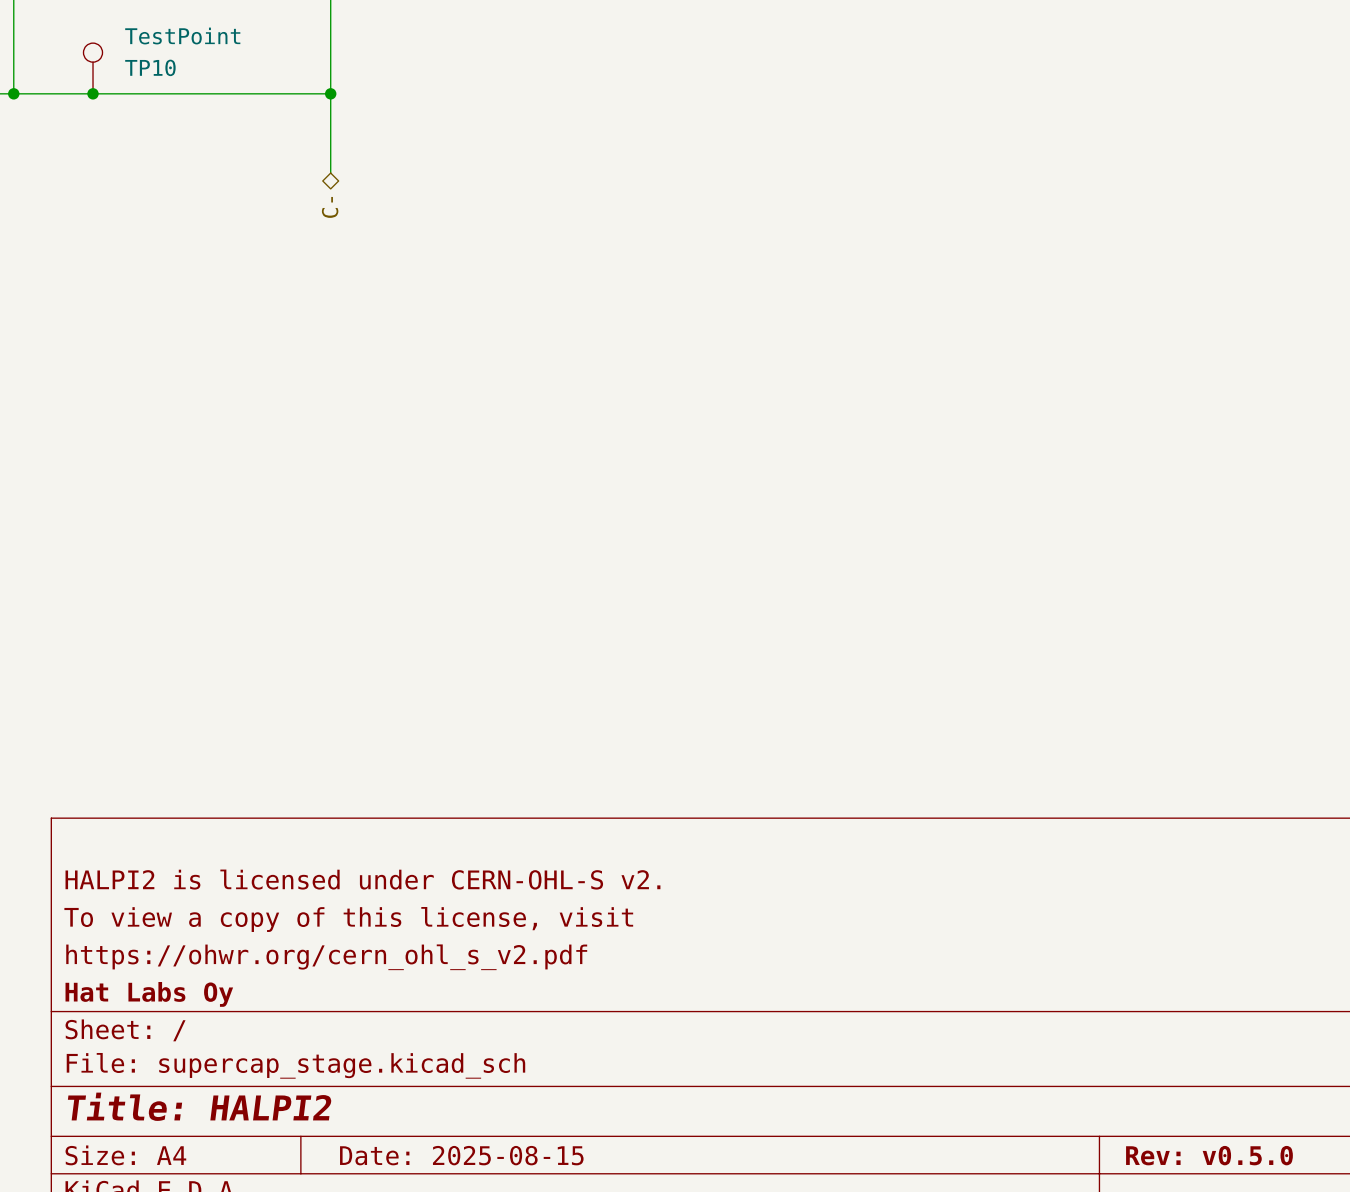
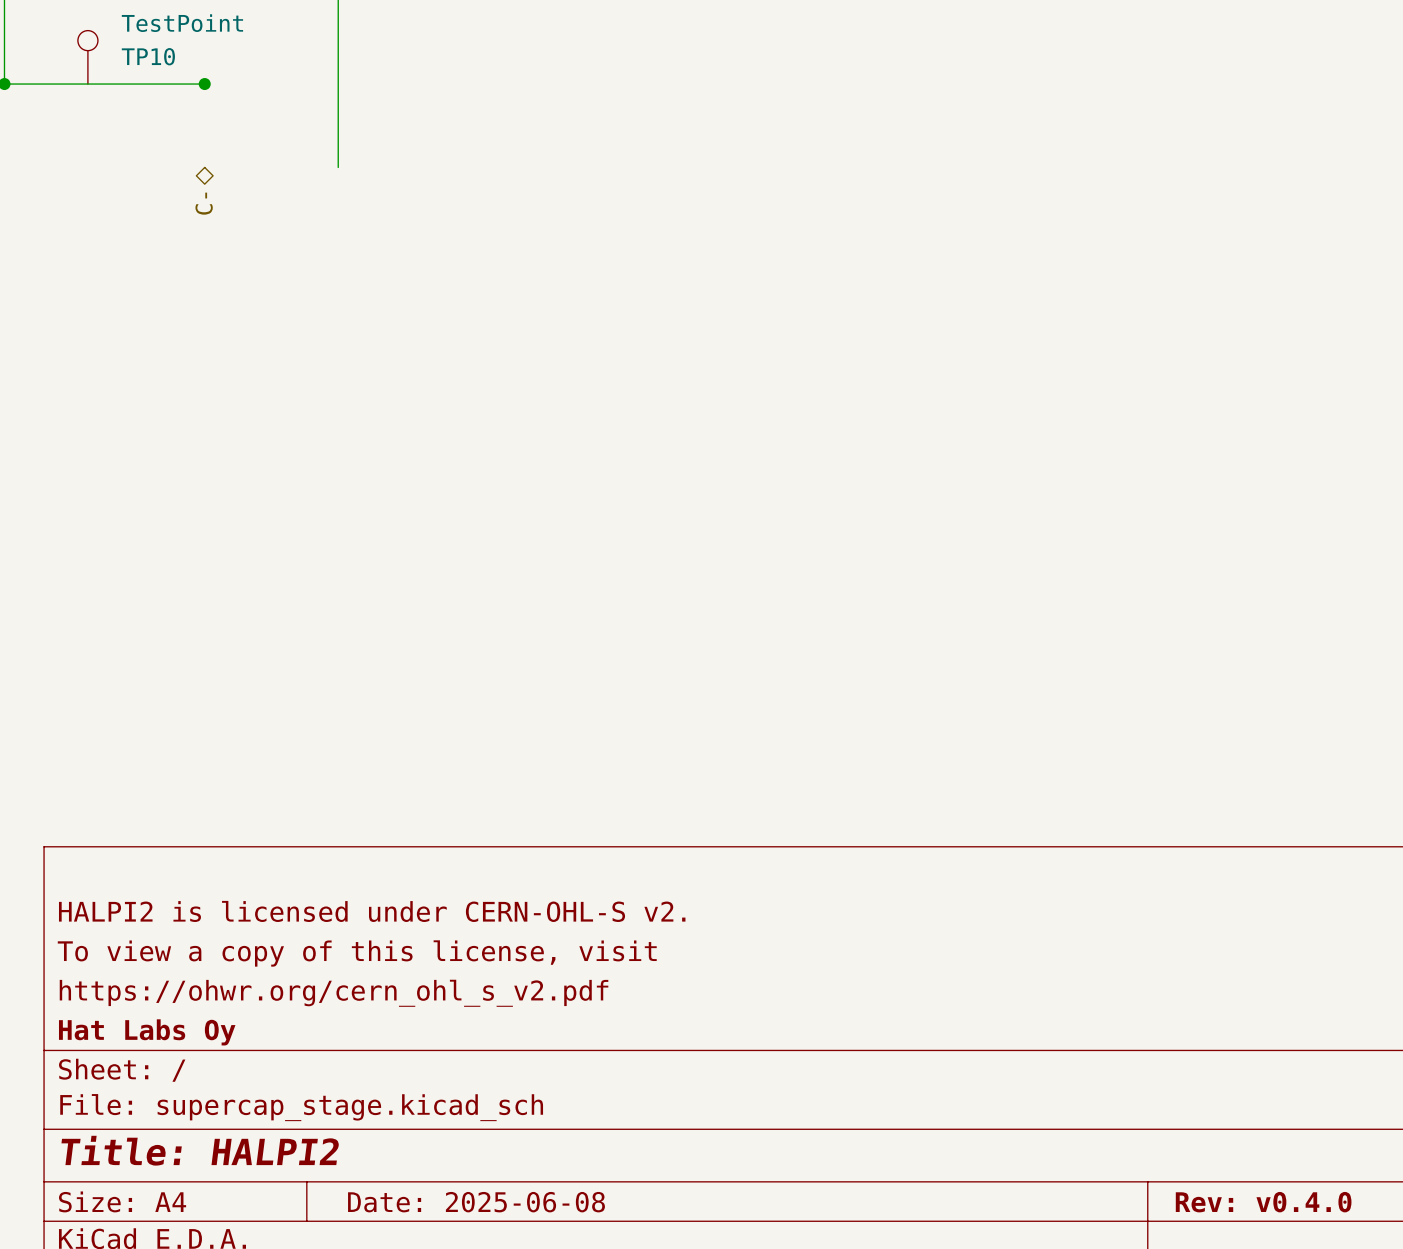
junction: (93, 93) -> none
wire: (203, 93) (330, 93) -> none
junction: none -> (204, 84)
junction: (330, 93) -> none
hierarchical label position: C- (330, 207) -> C- (204, 203)
title block: Date: 2025-08-15 (461, 1155) -> Date: 2025-06-08 (476, 1202)
title block: Rev: v0.5.0 (1209, 1155) -> Rev: v0.4.0 (1263, 1202)

